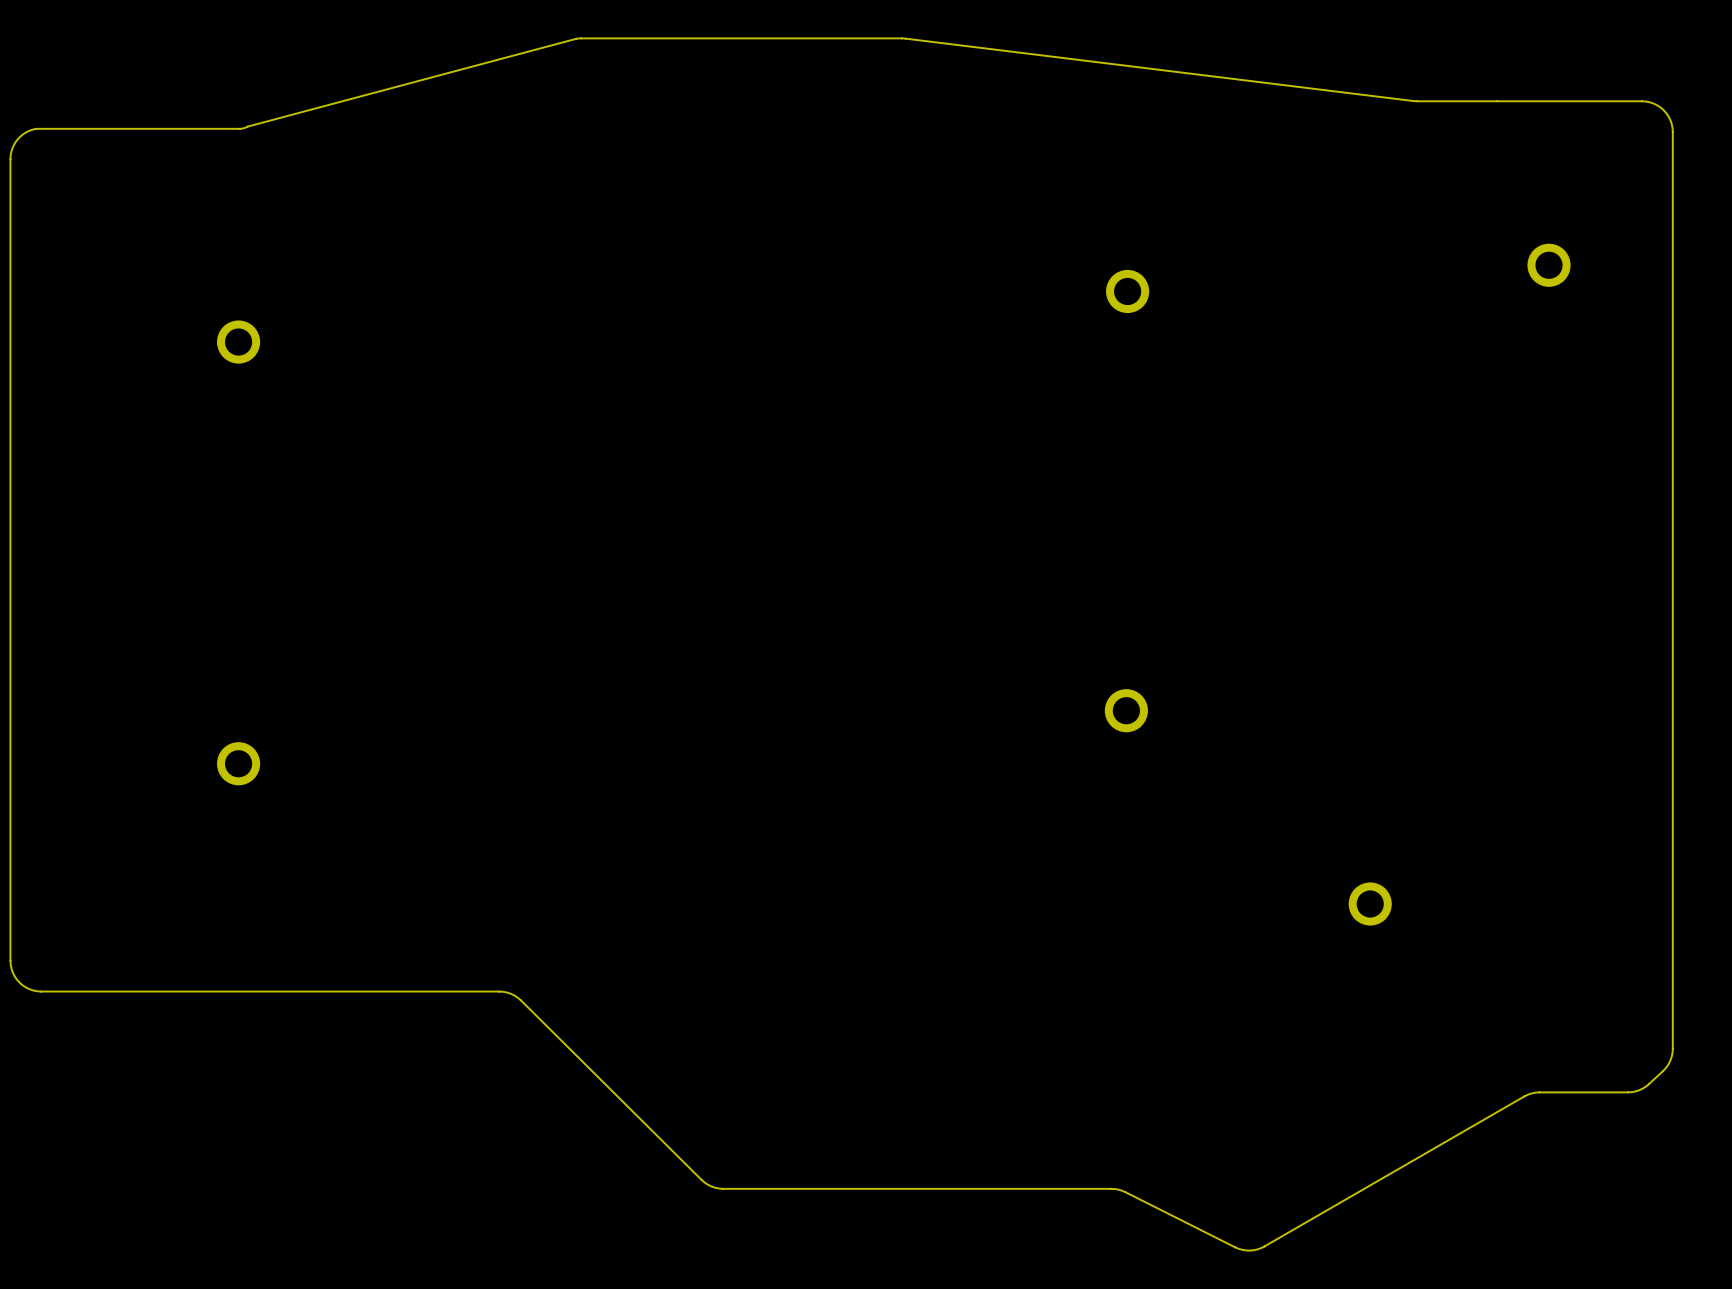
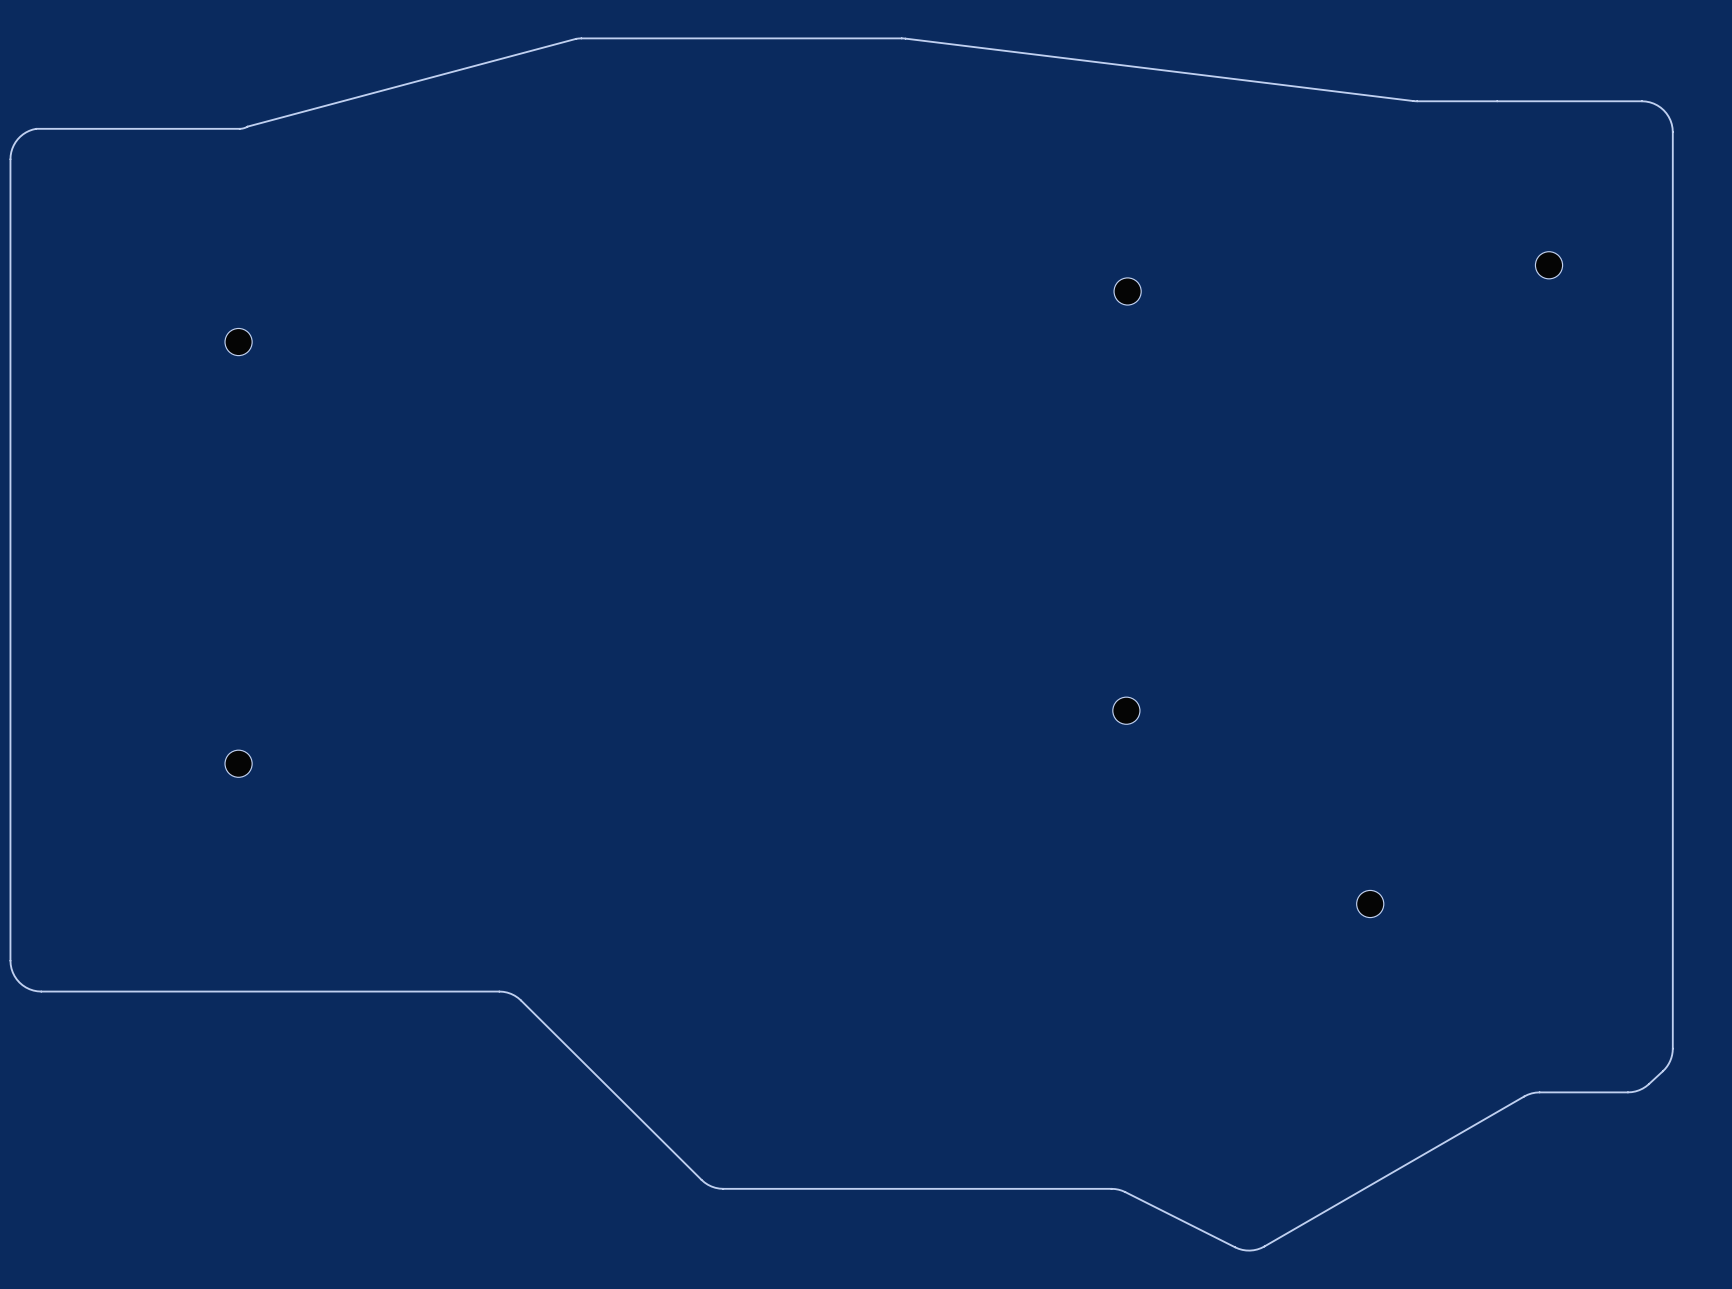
part footprint: [1527, 243, 1571, 287] -> [1535, 251, 1563, 279]
part footprint: [1106, 269, 1150, 314] -> [1114, 277, 1142, 306]
part footprint: [217, 320, 261, 364] -> [225, 328, 253, 356]
part footprint: [1104, 689, 1148, 733] -> [1112, 697, 1140, 725]
part footprint: [217, 742, 261, 786] -> [225, 750, 253, 778]
part footprint: [1348, 882, 1392, 926] -> [1356, 890, 1384, 918]

